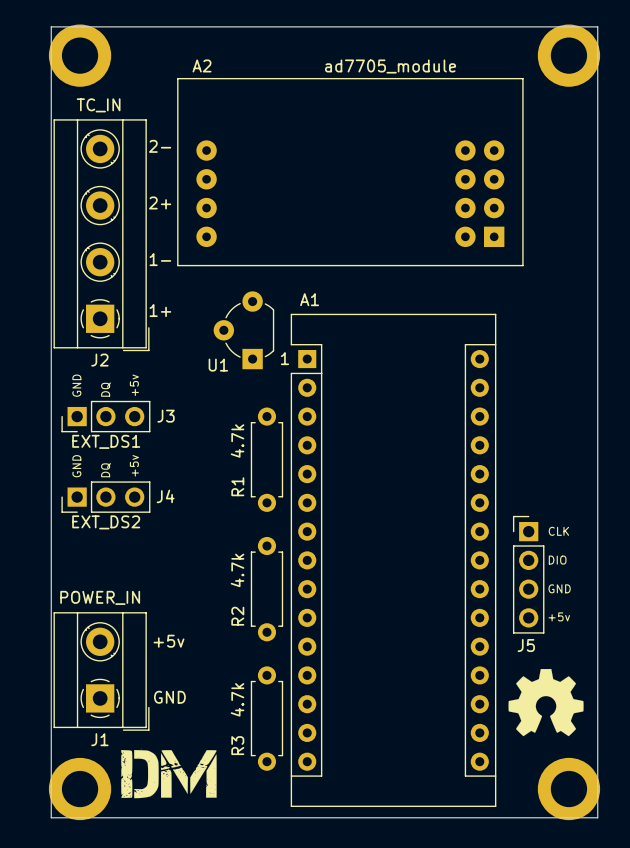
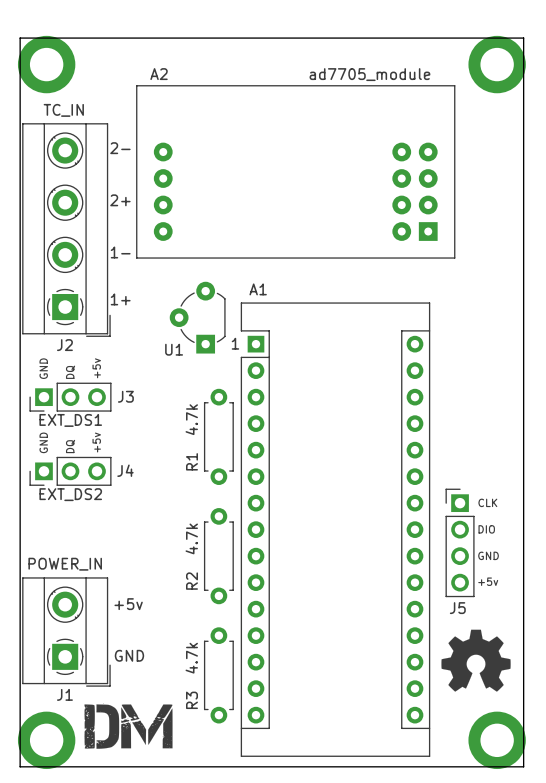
A2 value position: ad7705_module (390, 66) -> ad7705_module (369, 74)

